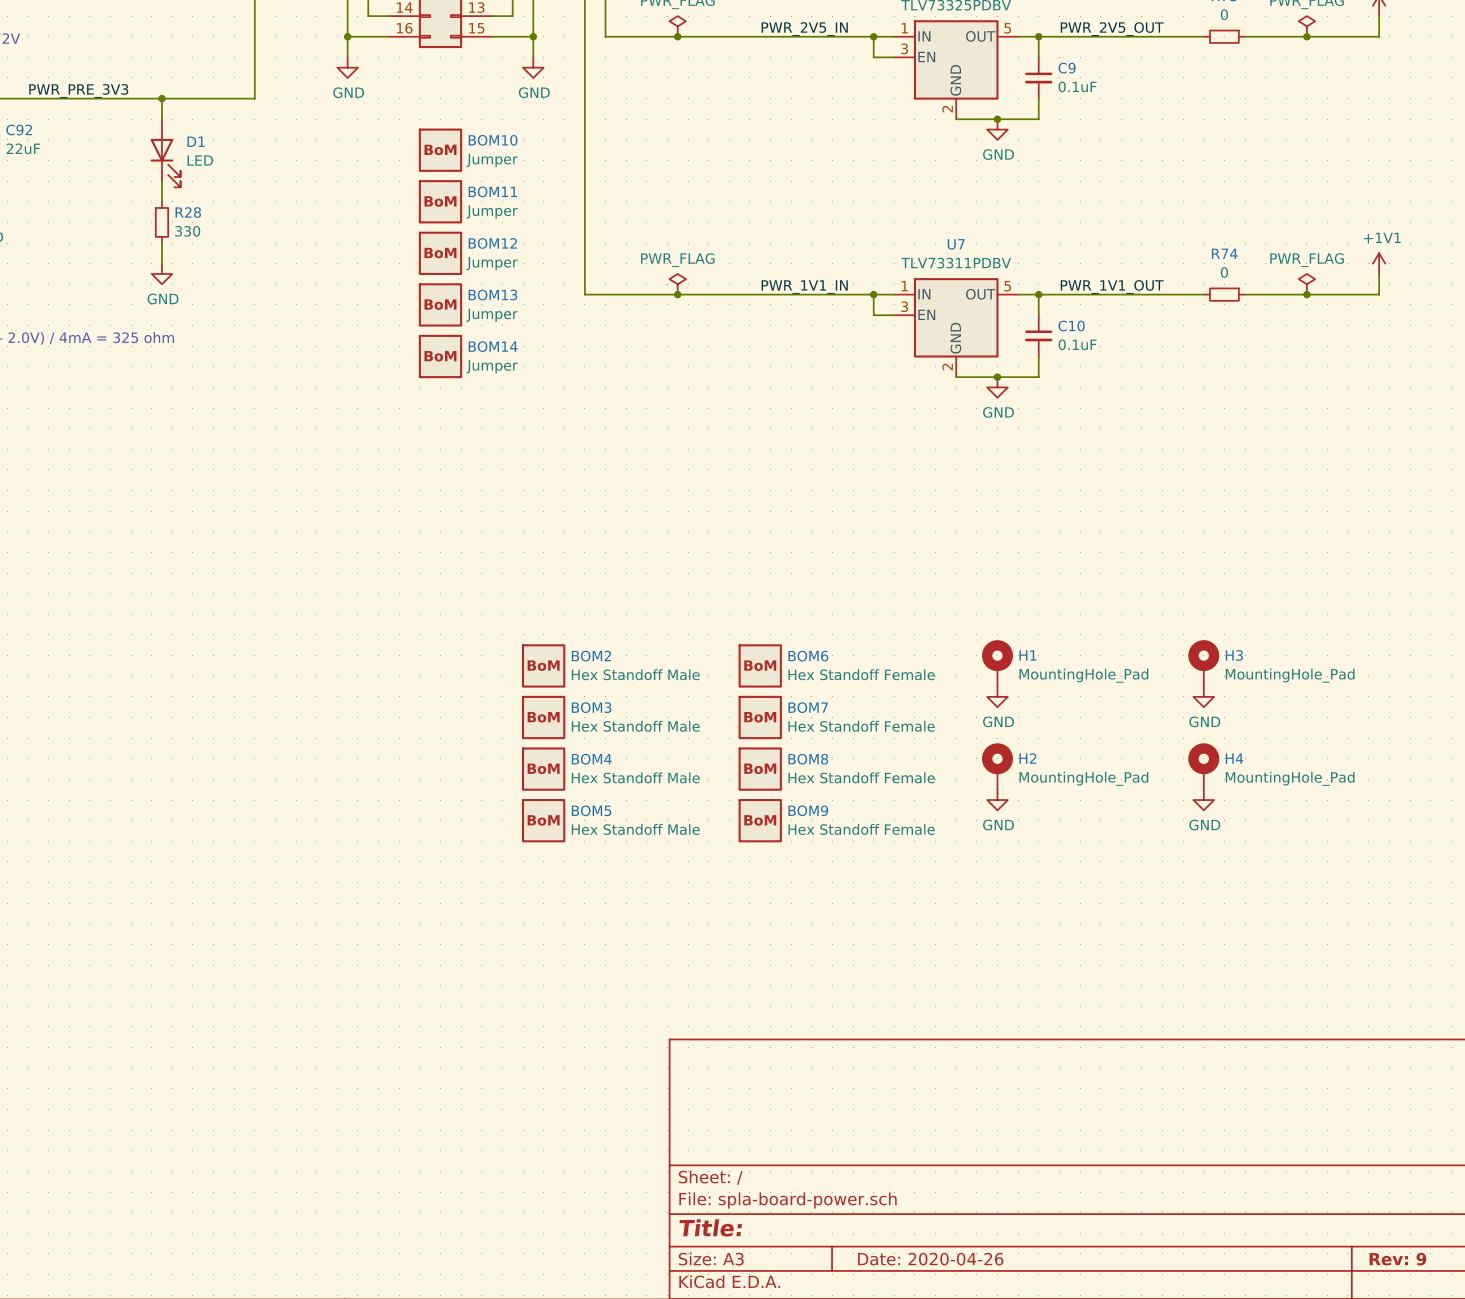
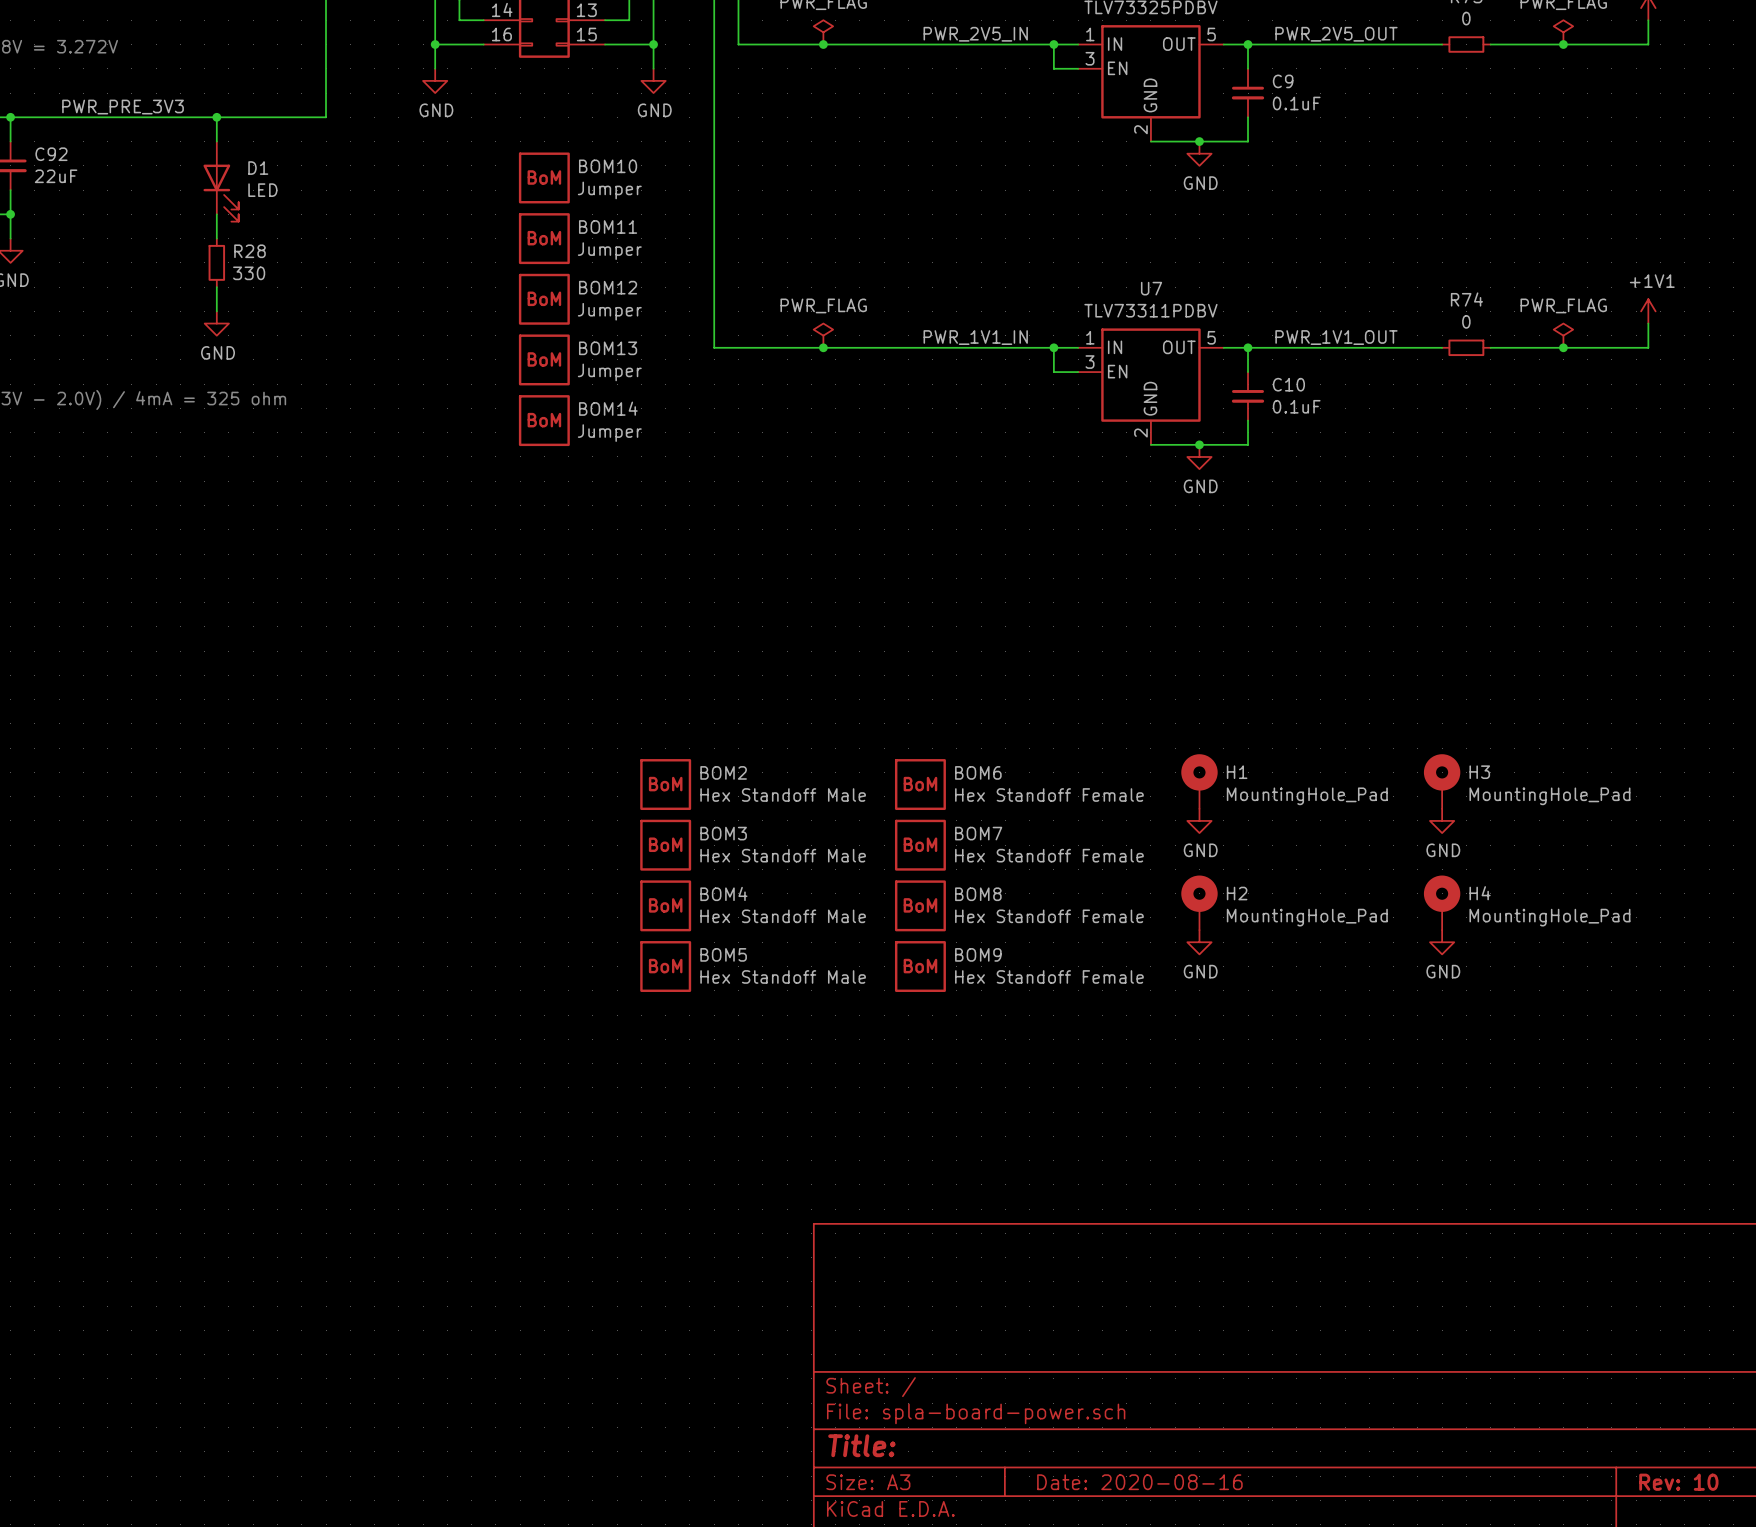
title block: Date: 2020-04-26 (930, 1259) -> Date: 2020-08-16 (1139, 1482)
title block: Rev: 9 (1397, 1259) -> Rev: 10 (1678, 1482)

